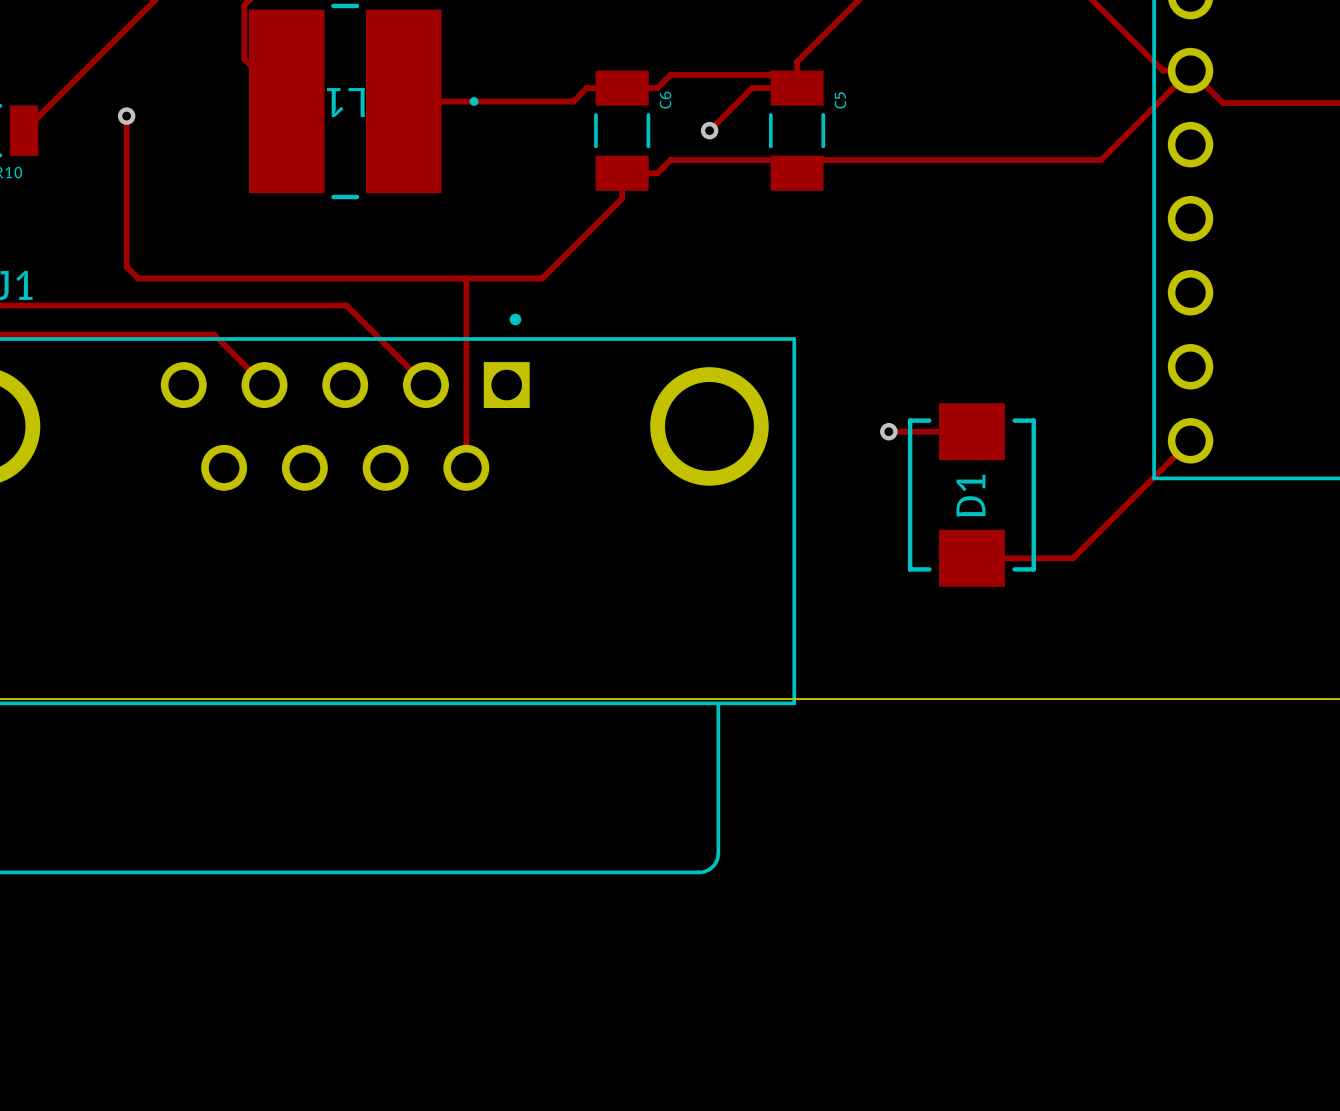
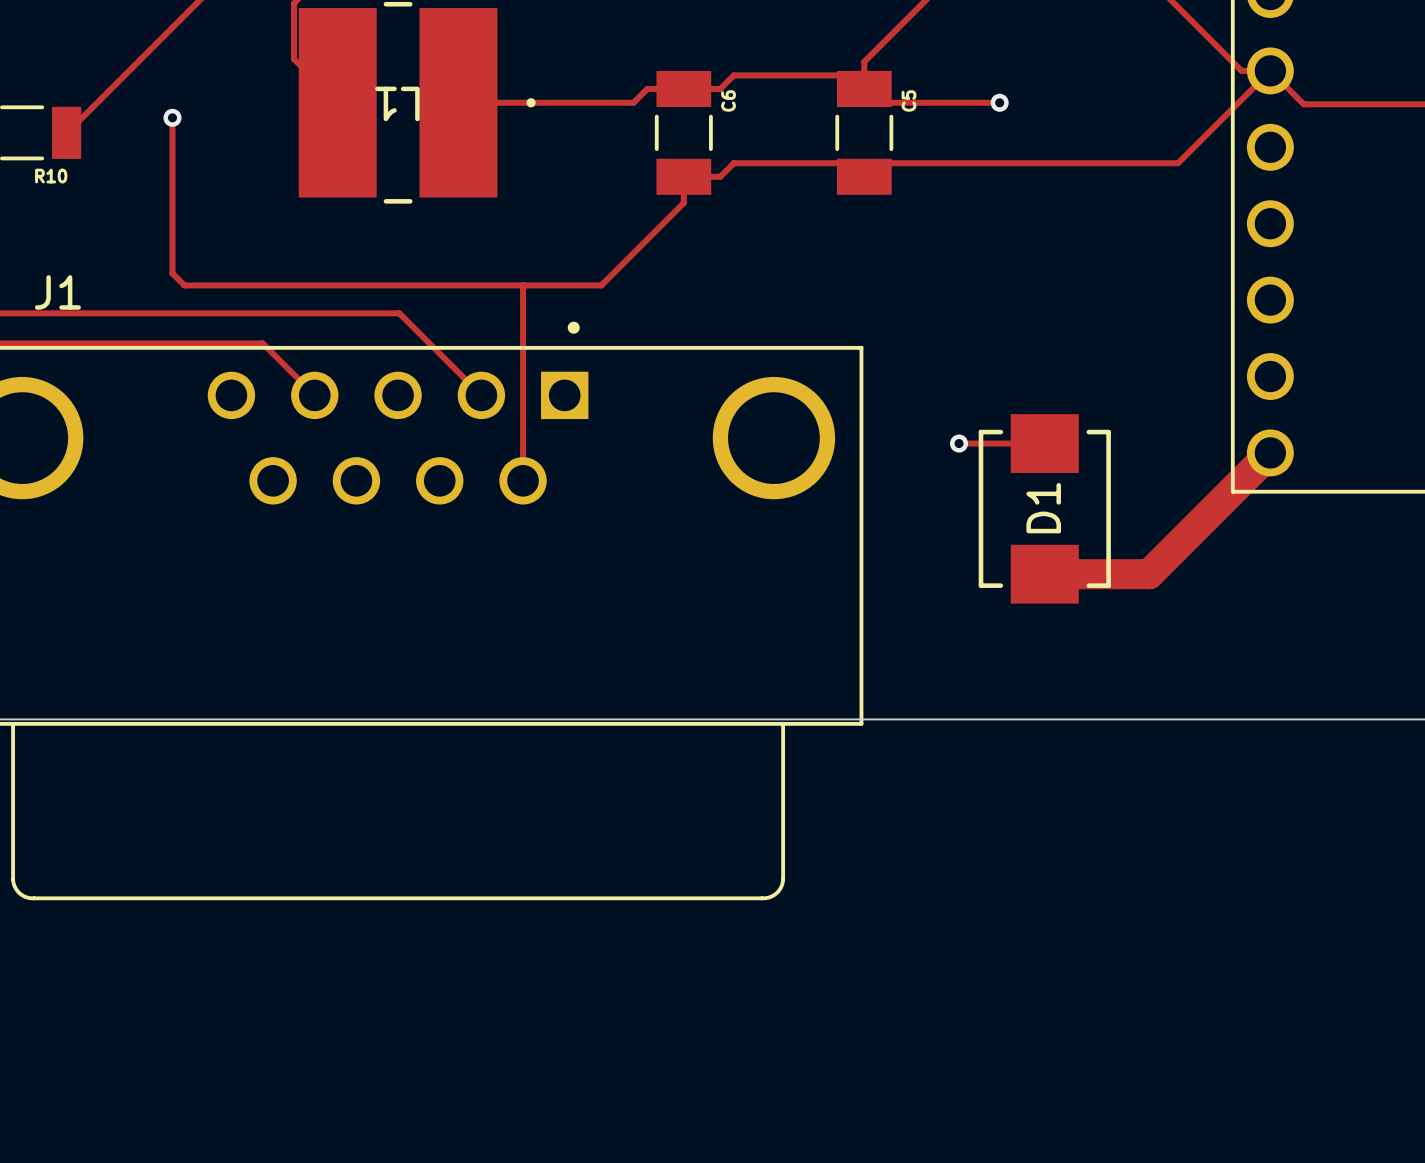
track: (797, 88) (752, 88) (709, 130) -> (864, 88) (878, 102) (999, 102)
via: none -> (999, 102)
via: (709, 130) -> none
track width: thin (1190, 440) (1073, 558) (971, 558) -> thick (1270, 452) (1149, 574) (1044, 574)

